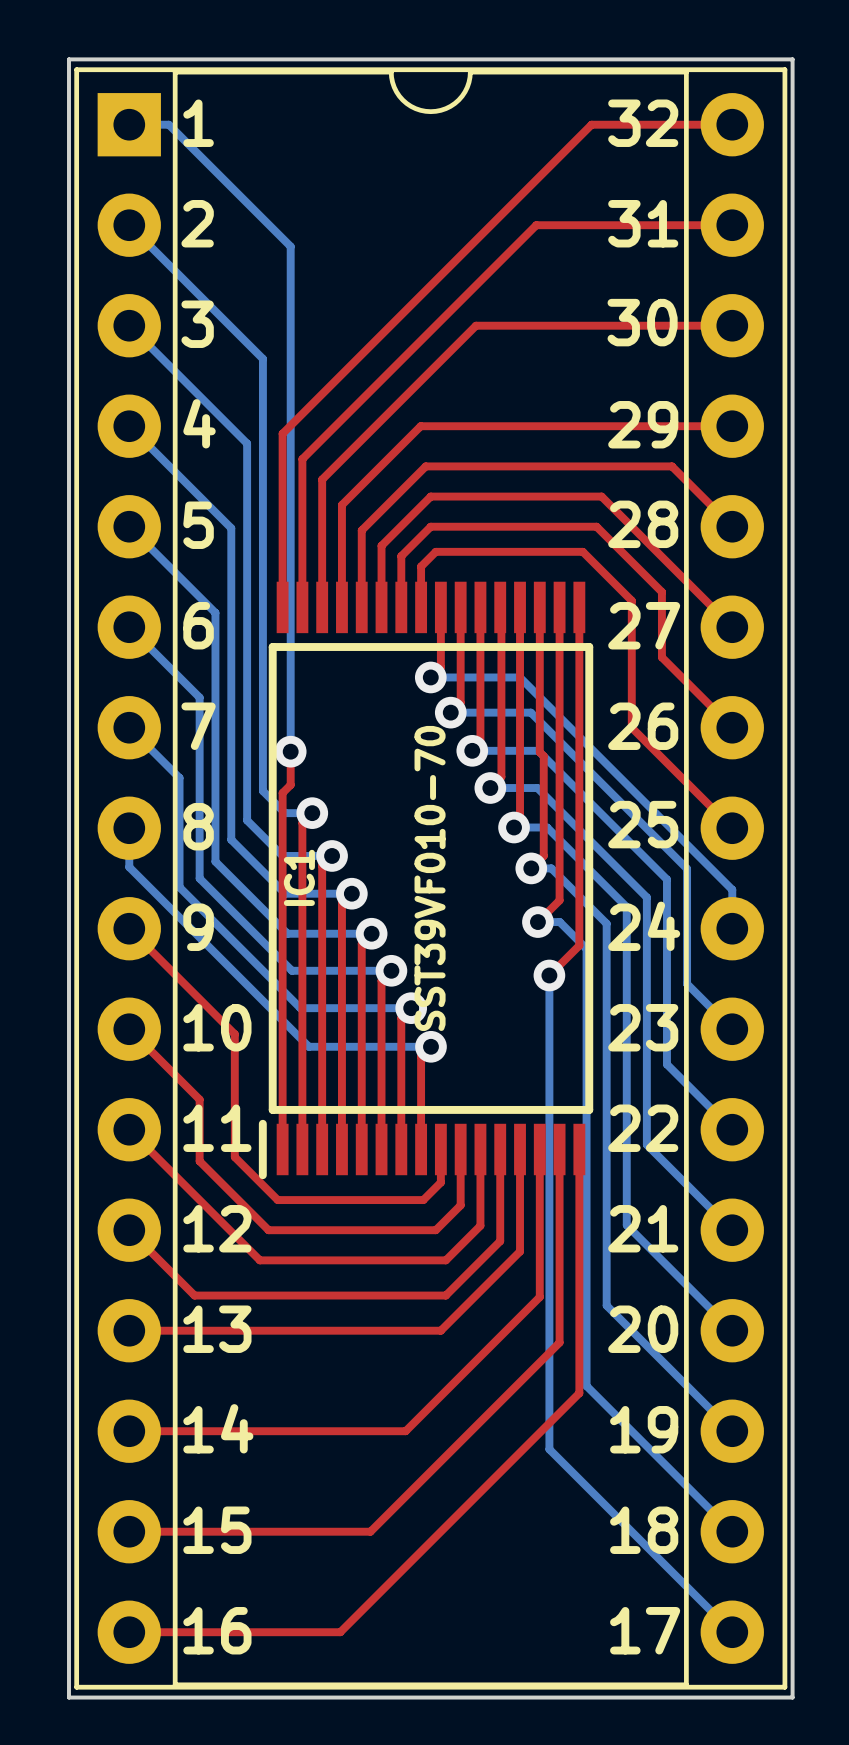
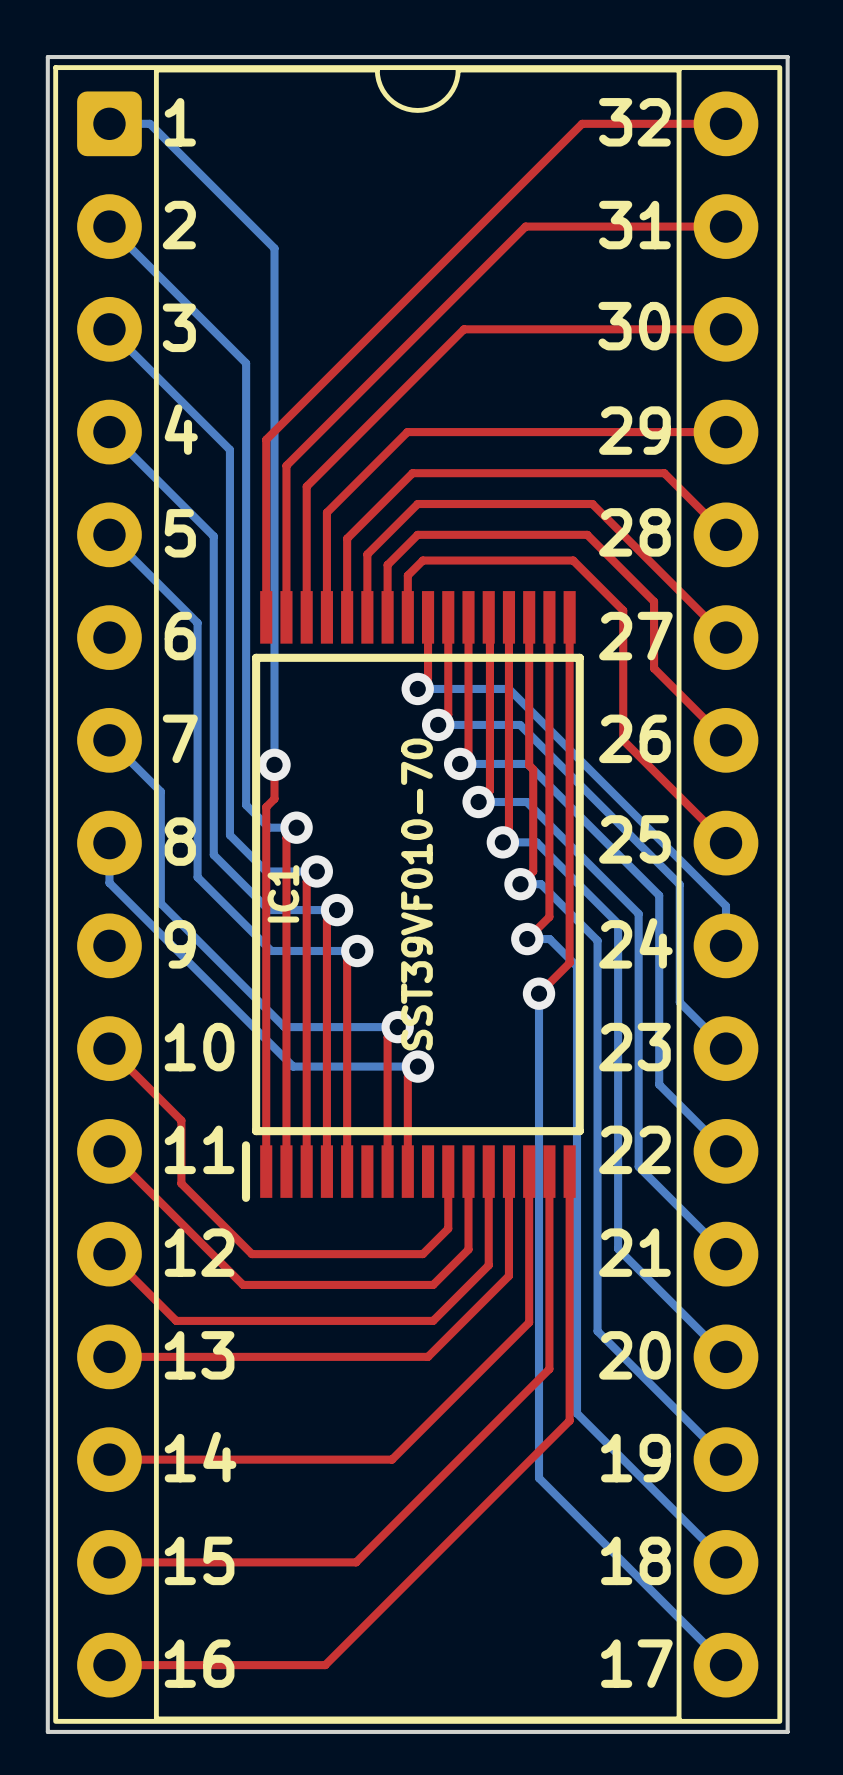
part footprint: [74, 67, 788, 1690] -> [53, 65, 783, 1724]
bottom track: (129, 627) (199, 697) (199, 878) (291, 970) (391, 970) -> none
top track: (129, 928) (234, 1034) (234, 1157) (277, 1200) (423, 1200) (440, 1182) (440, 1149) -> none
top track: (391, 970) (381, 980) (381, 1149) -> none
via: (391, 970) -> none

